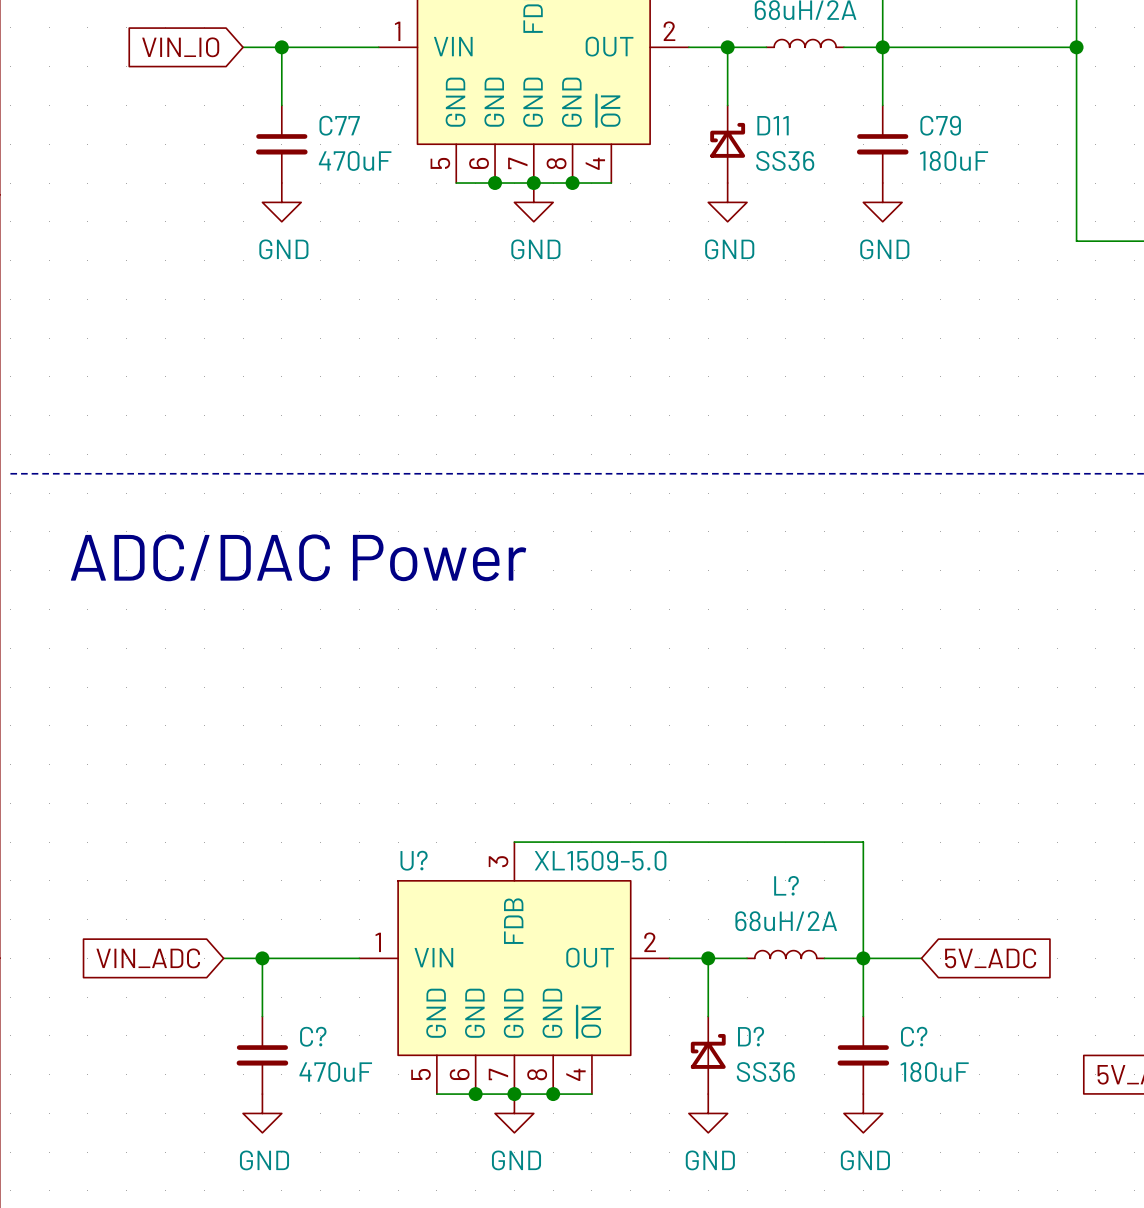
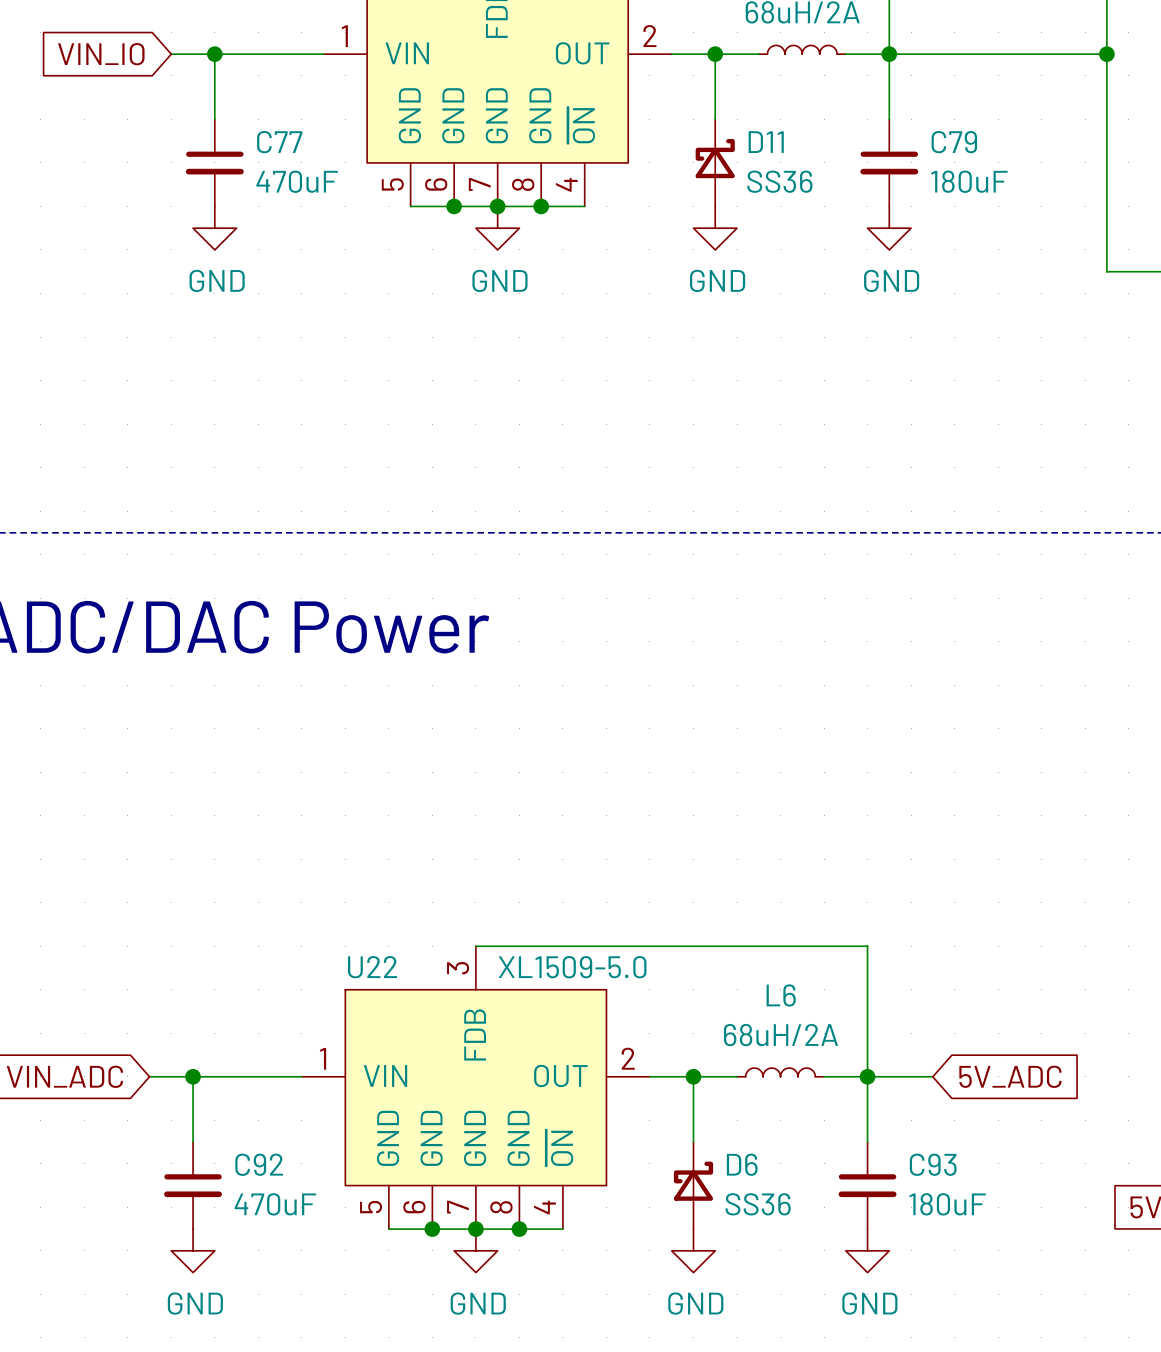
U? name: U? (414, 860) -> U22 (372, 967)
L? name: L? (786, 885) -> L6 (781, 995)
C? name: C? (313, 1036) -> C92 (259, 1164)
D? name: D? (751, 1036) -> D6 (742, 1164)
C? name: C? (914, 1036) -> C93 (933, 1164)

